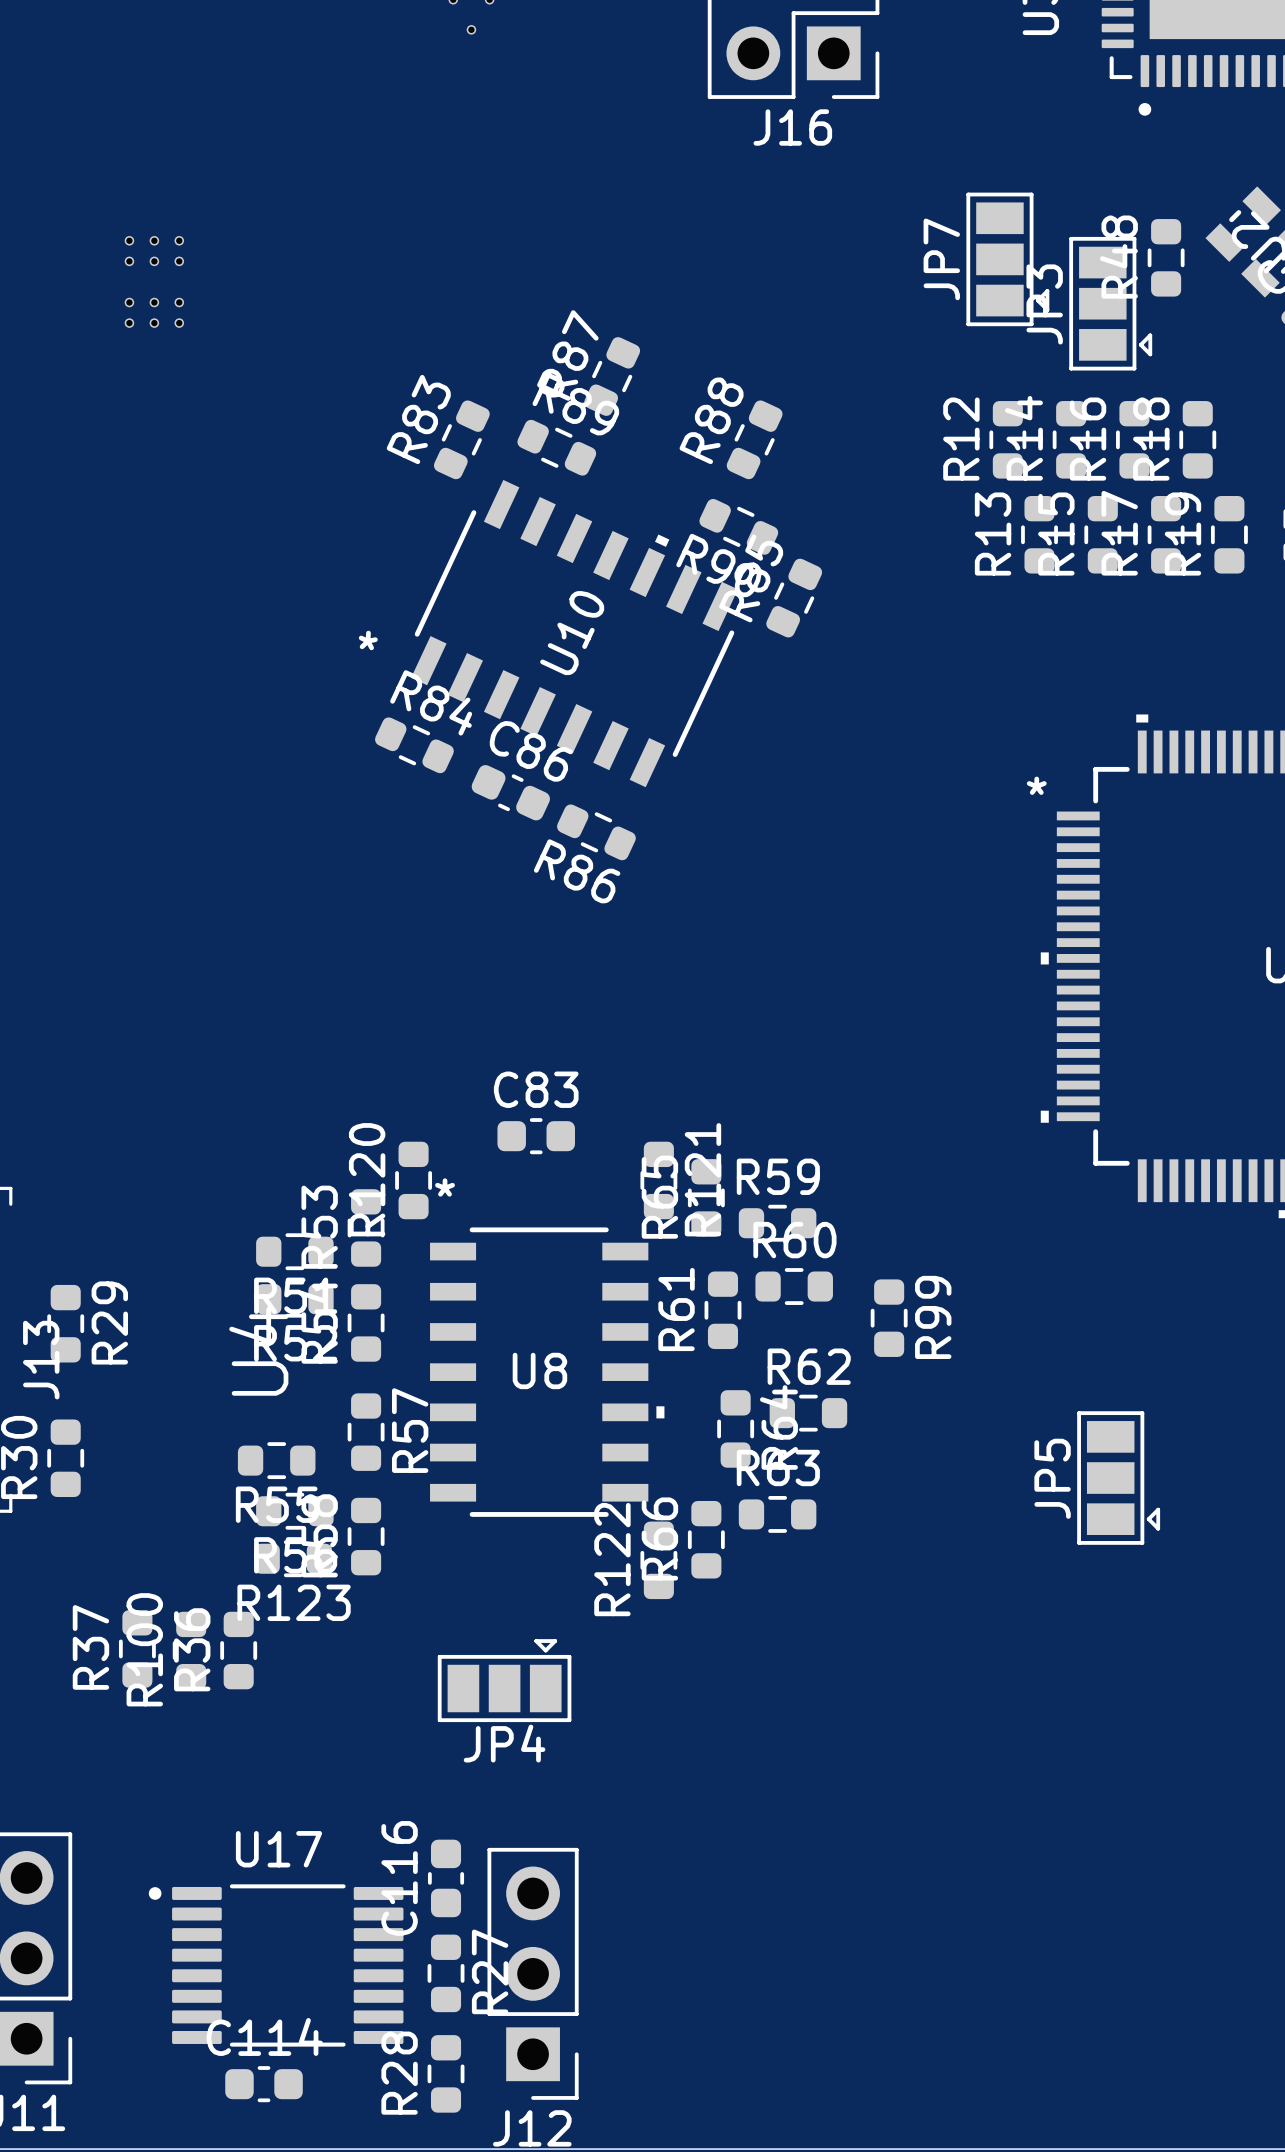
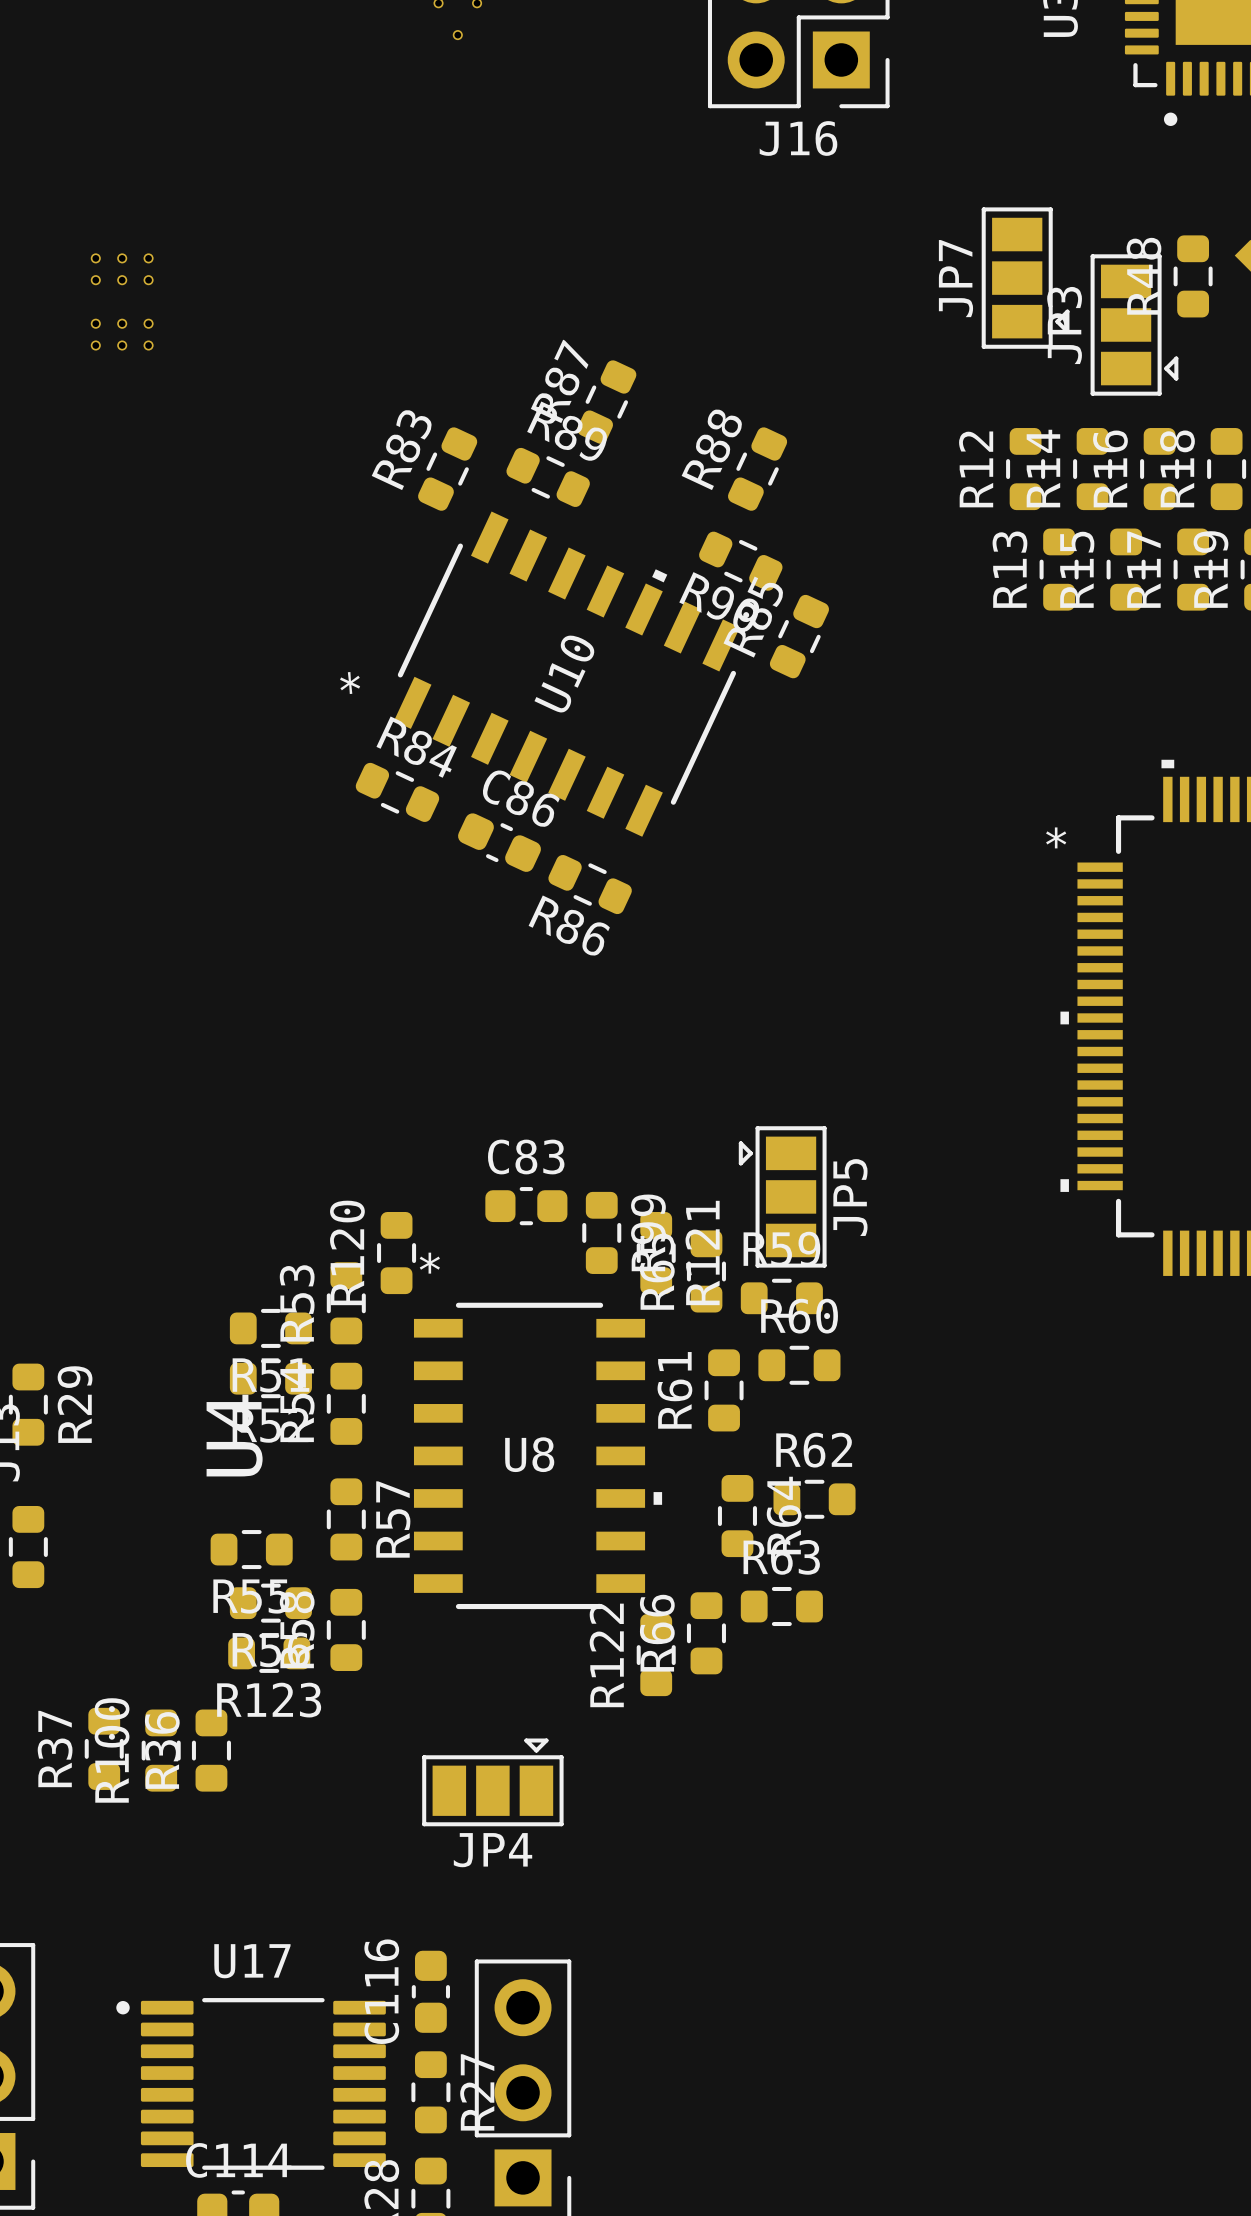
R99 position: (889, 1318) -> (601, 1232)
JP5 rotation: 0° (1118, 1478) -> 180° (782, 1196)
JP5 position: (1118, 1478) -> (782, 1196)

